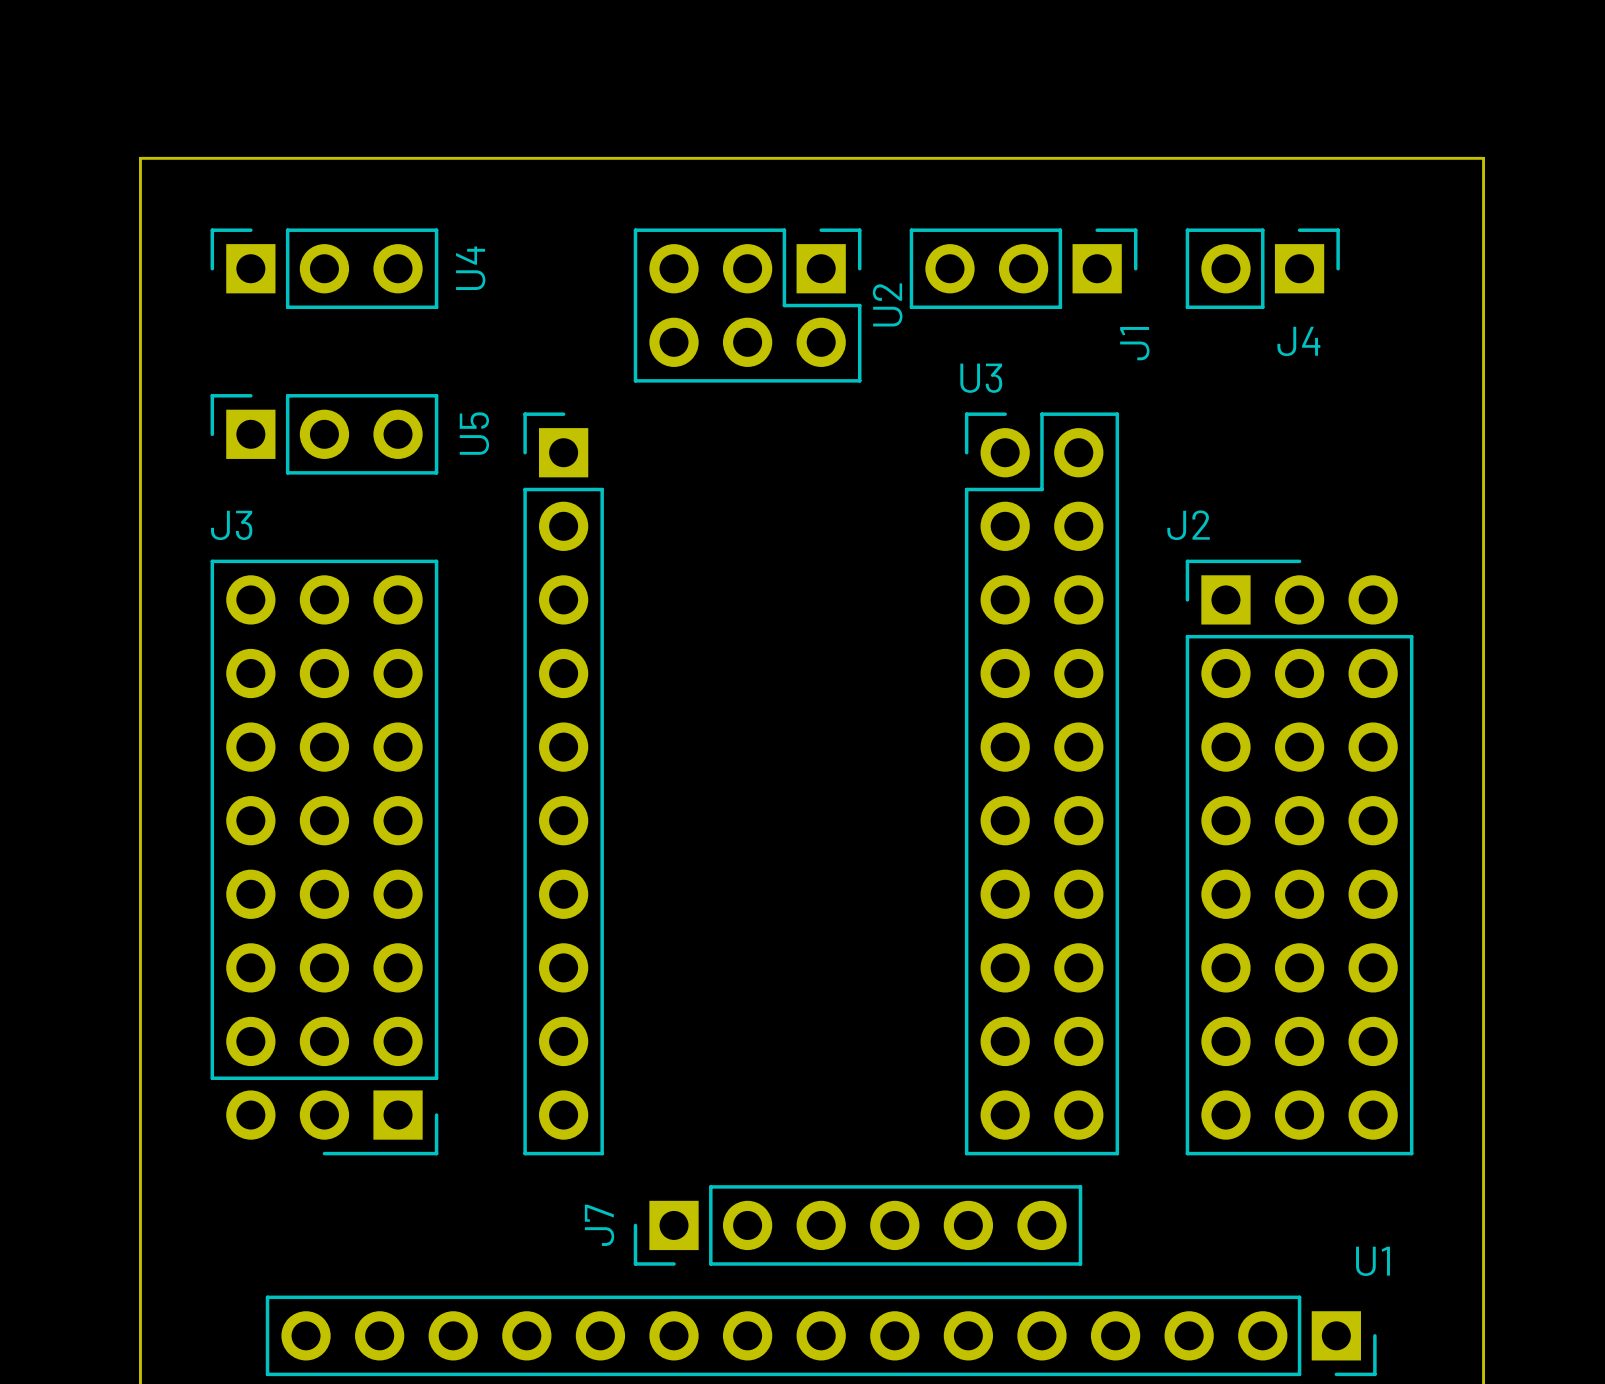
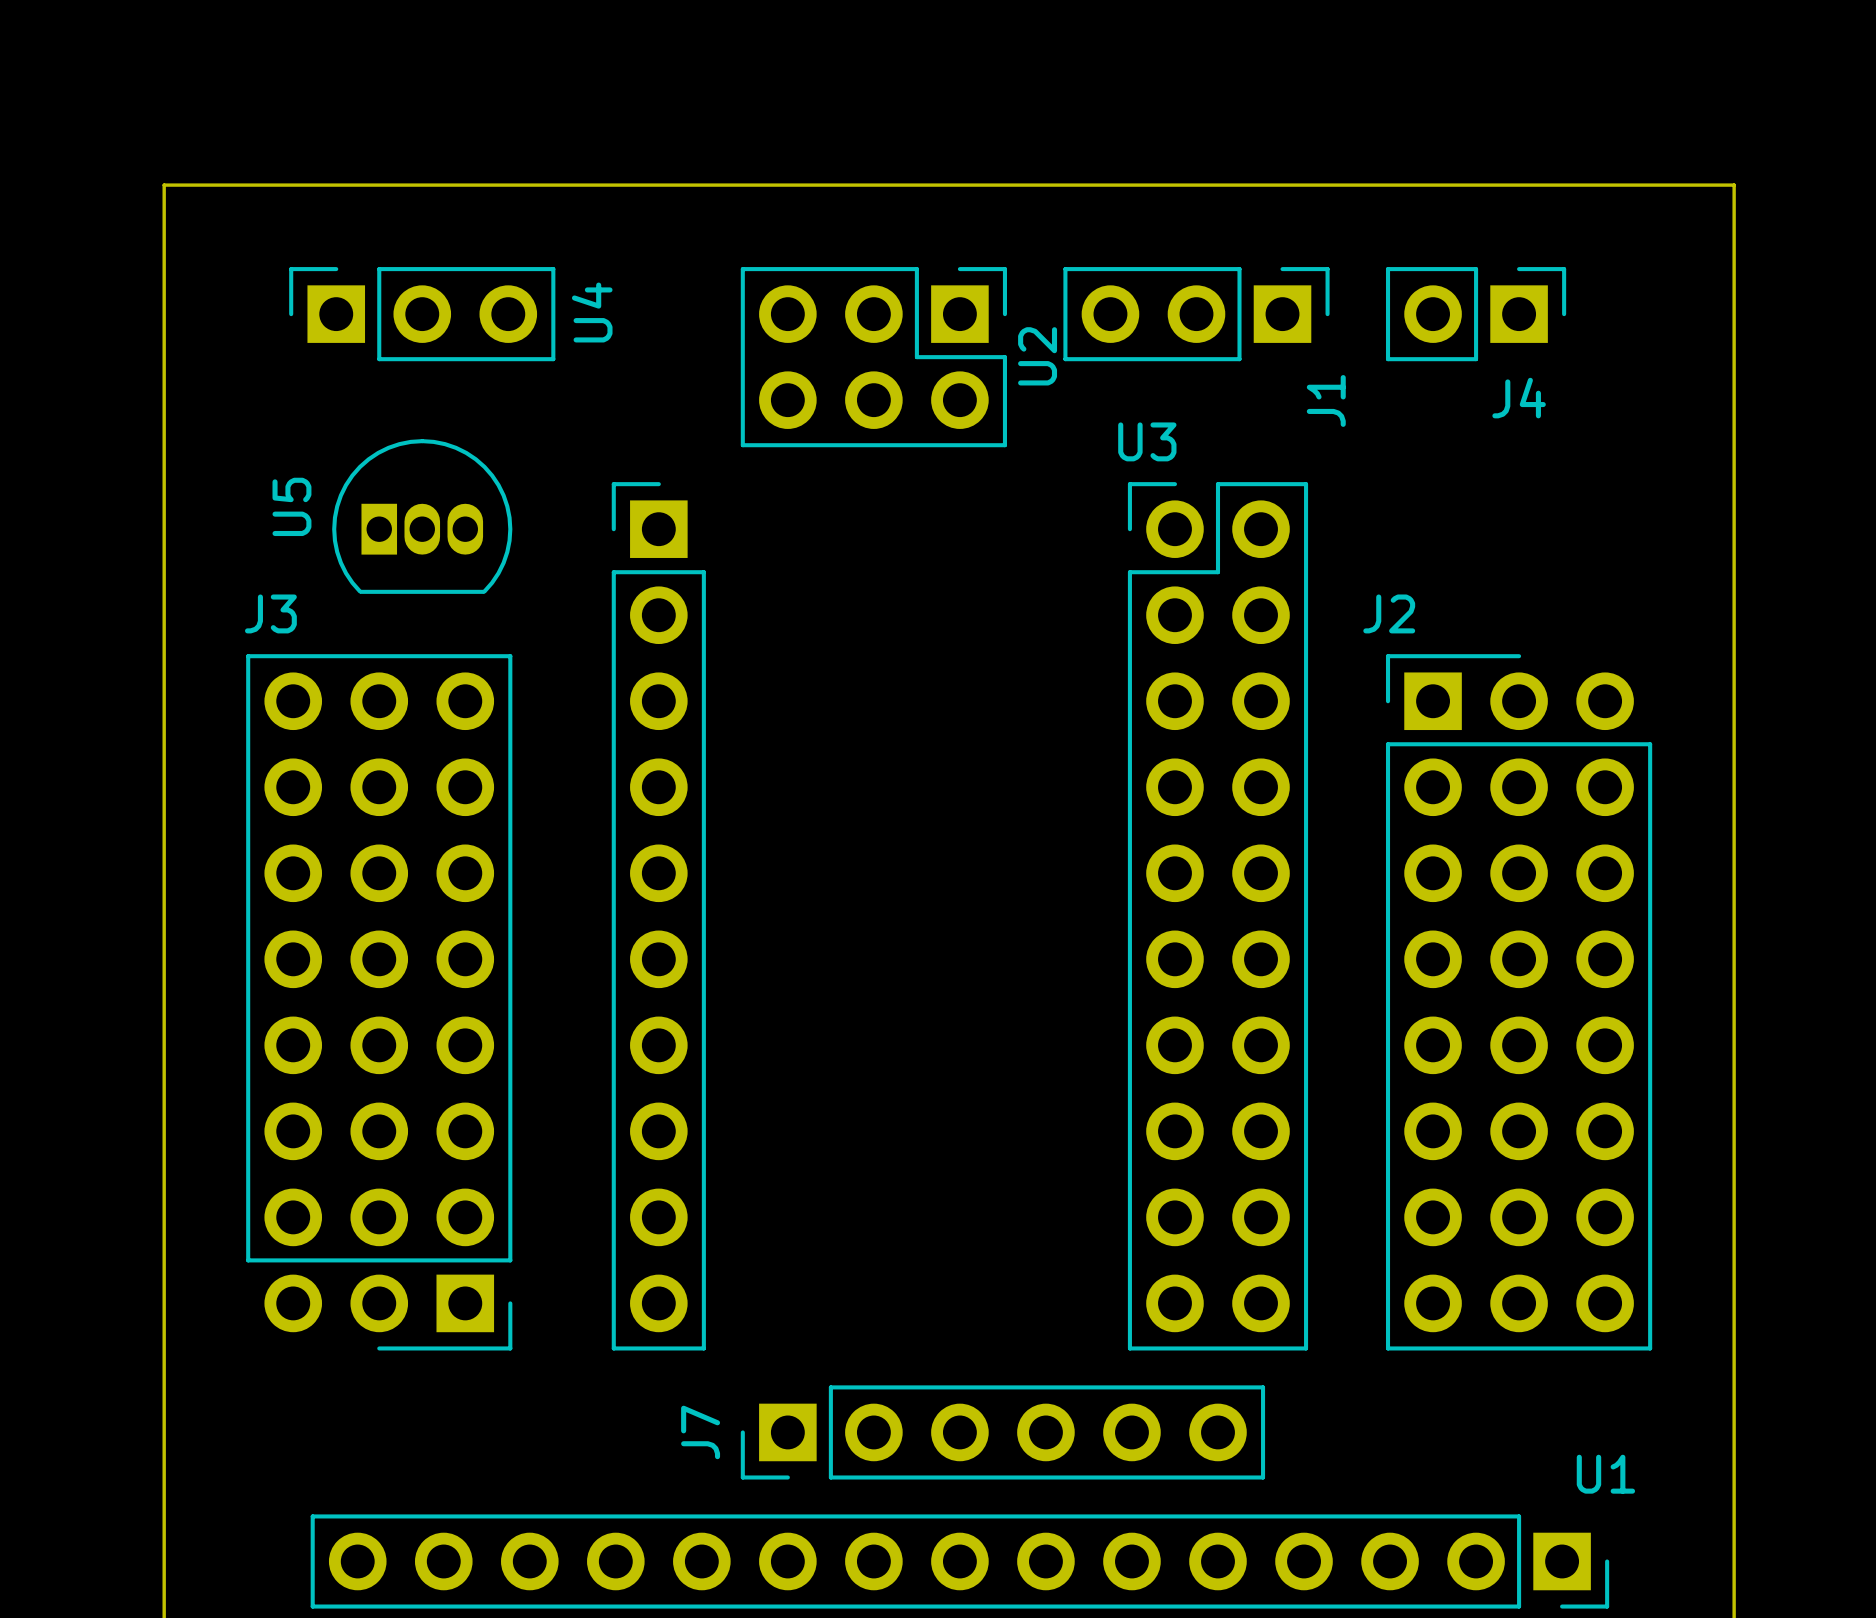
U4 position: (324, 268) -> (422, 314)
U5 footprint: [210, 394, 439, 475] -> [332, 439, 513, 594]
U5 name position: U5 (474, 433) -> U5 (291, 506)

